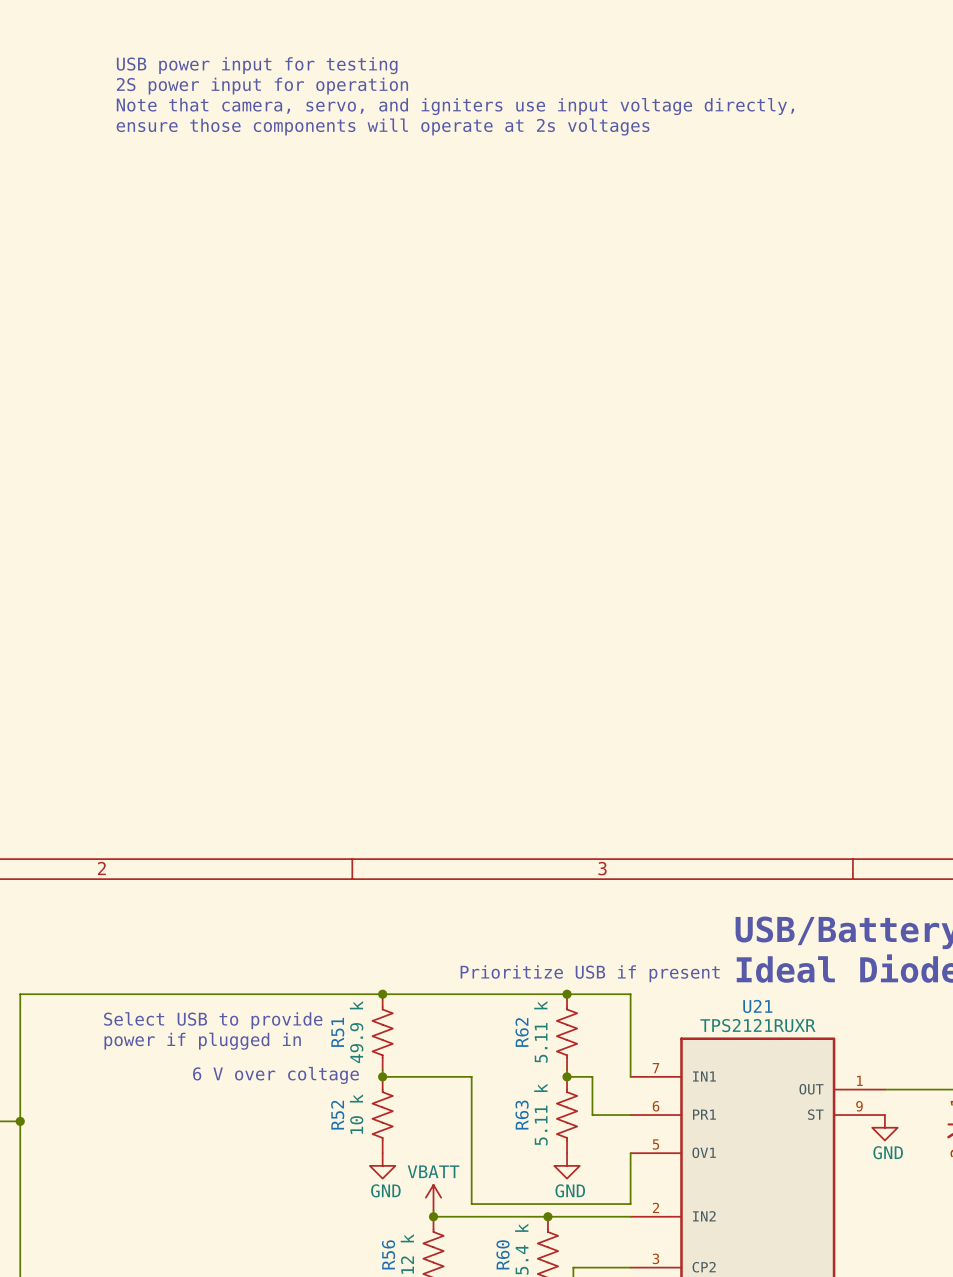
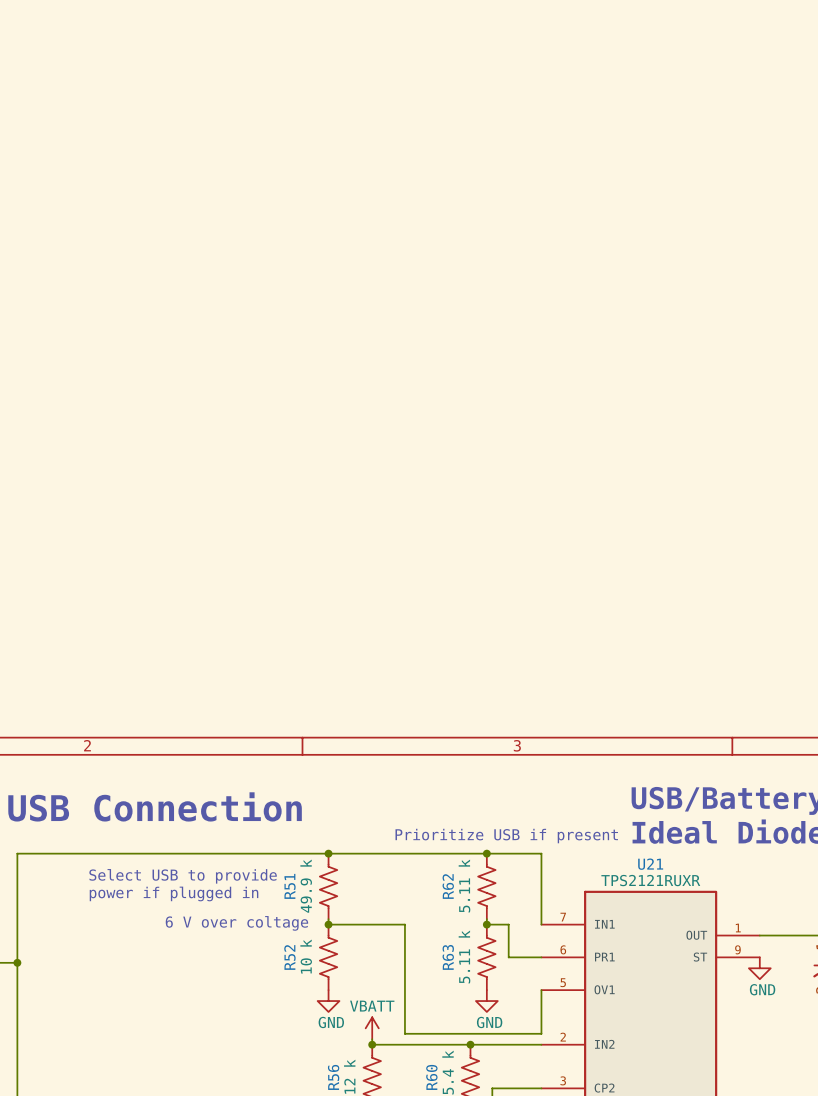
text: USB power input for testing (257, 65) -> none
text: 2S power input for operation (262, 86) -> none
text: Note that camera, servo, and igniters use input voltage directly, (455, 106) -> none
text: ensure those components will operate at 2s voltages (383, 127) -> none
text: none -> USB Connection (155, 806)

